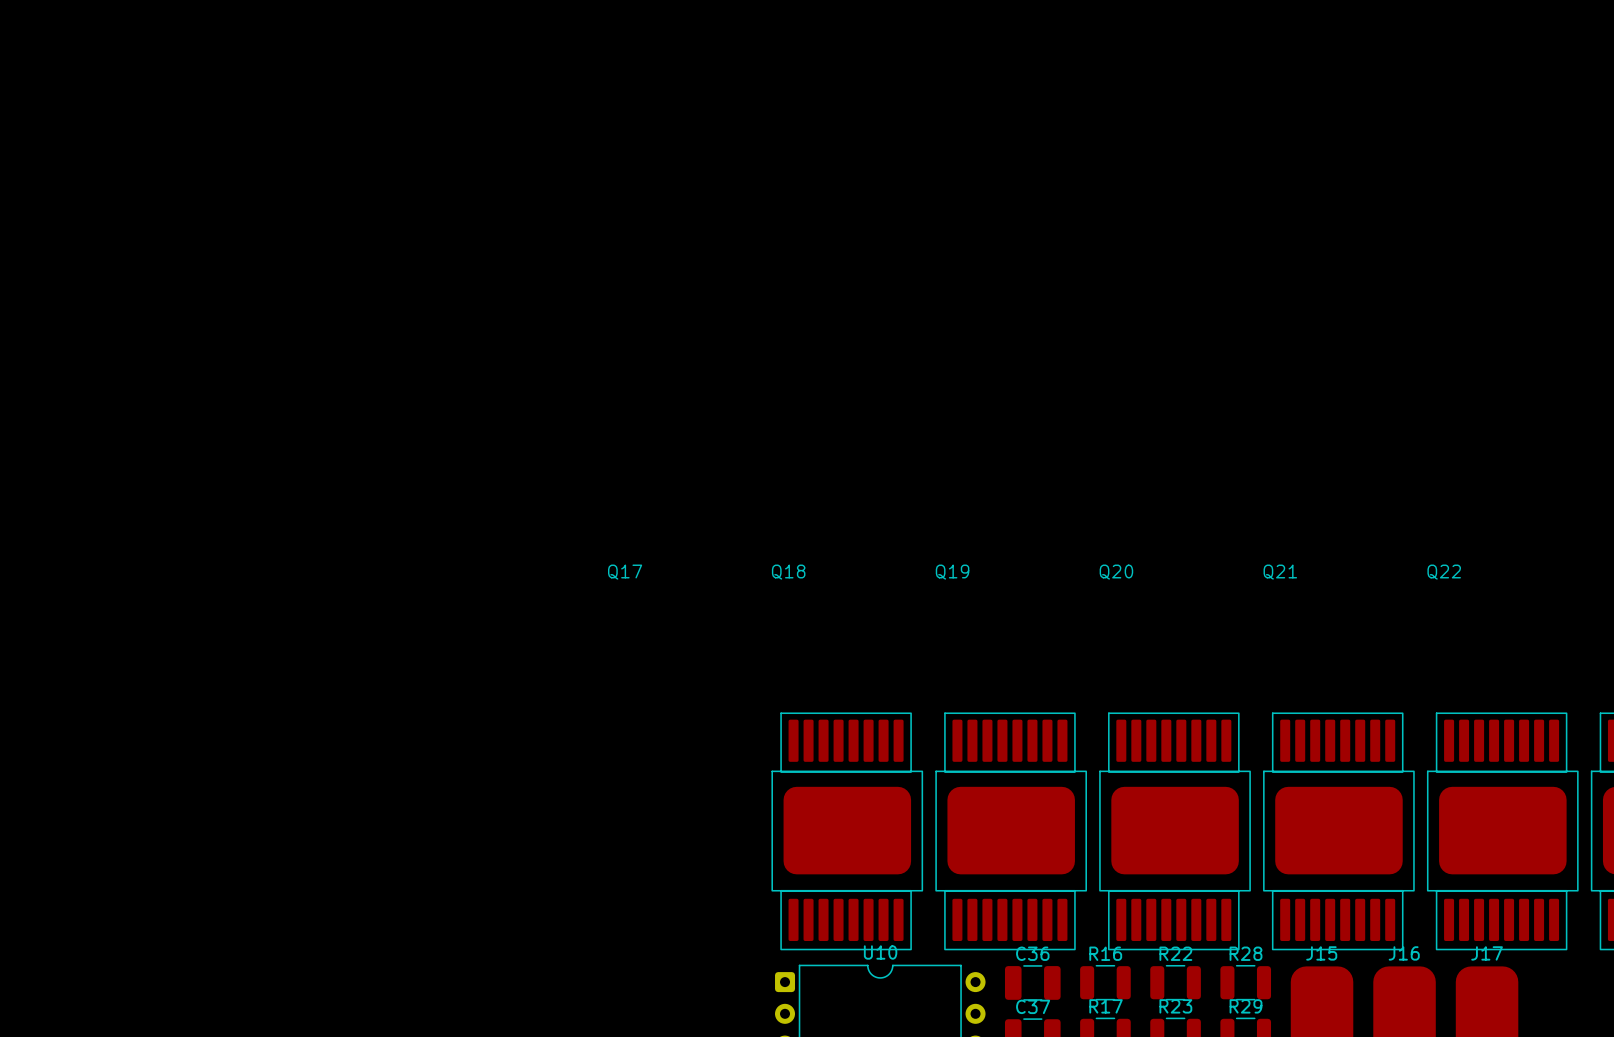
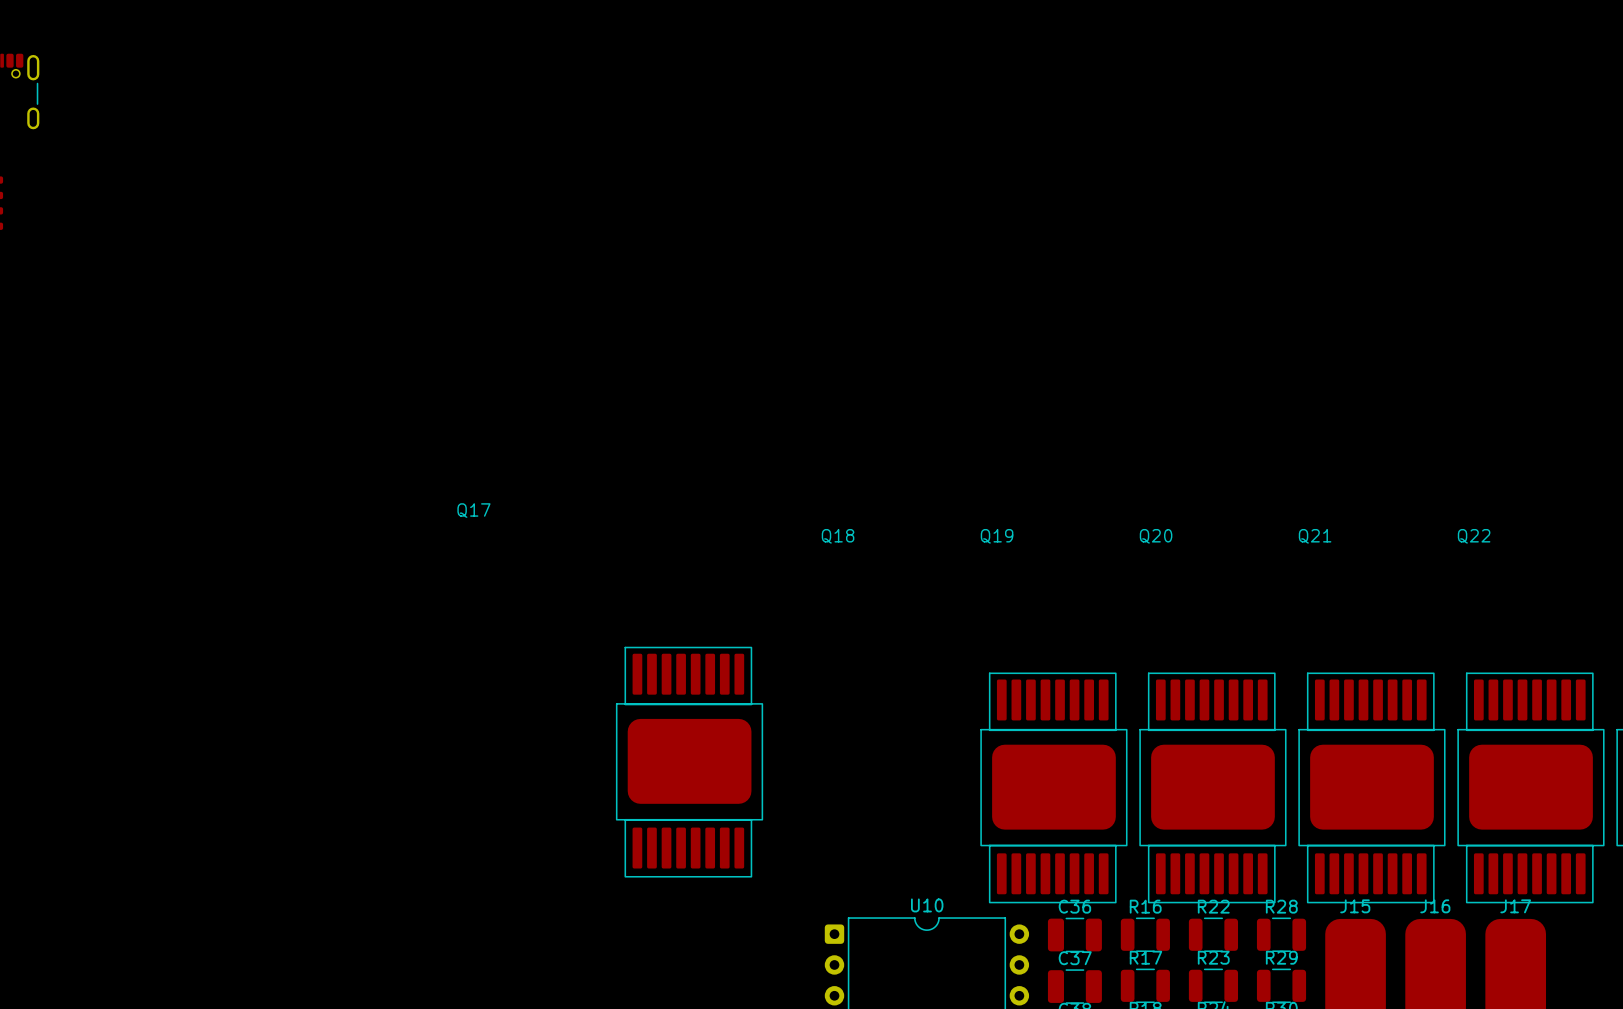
Q17 position: (847, 831) -> (689, 762)

